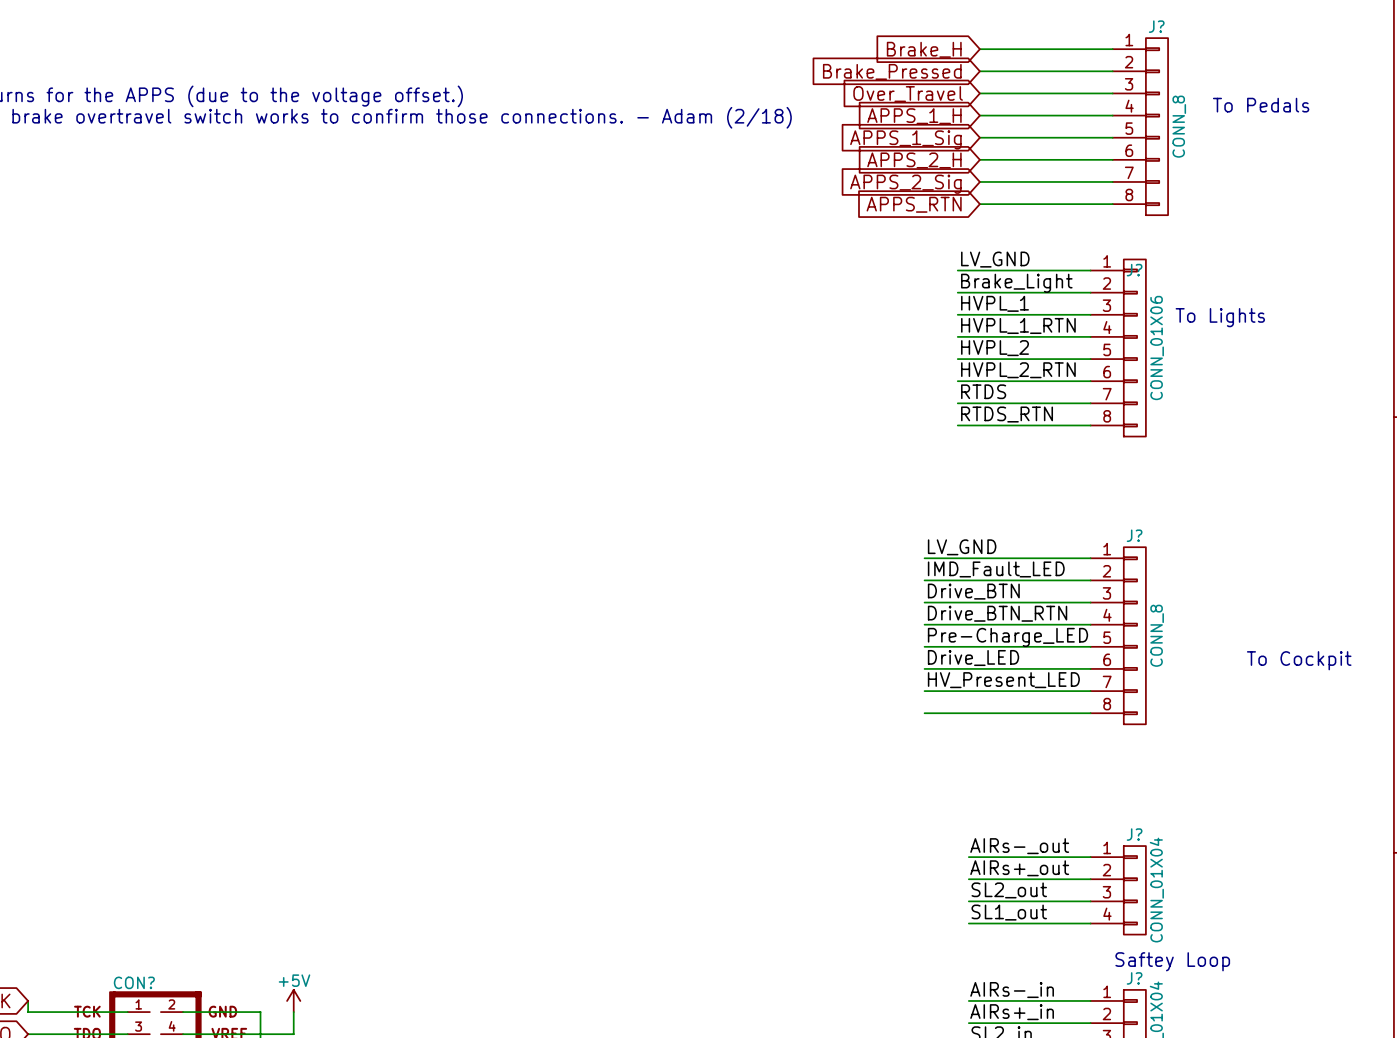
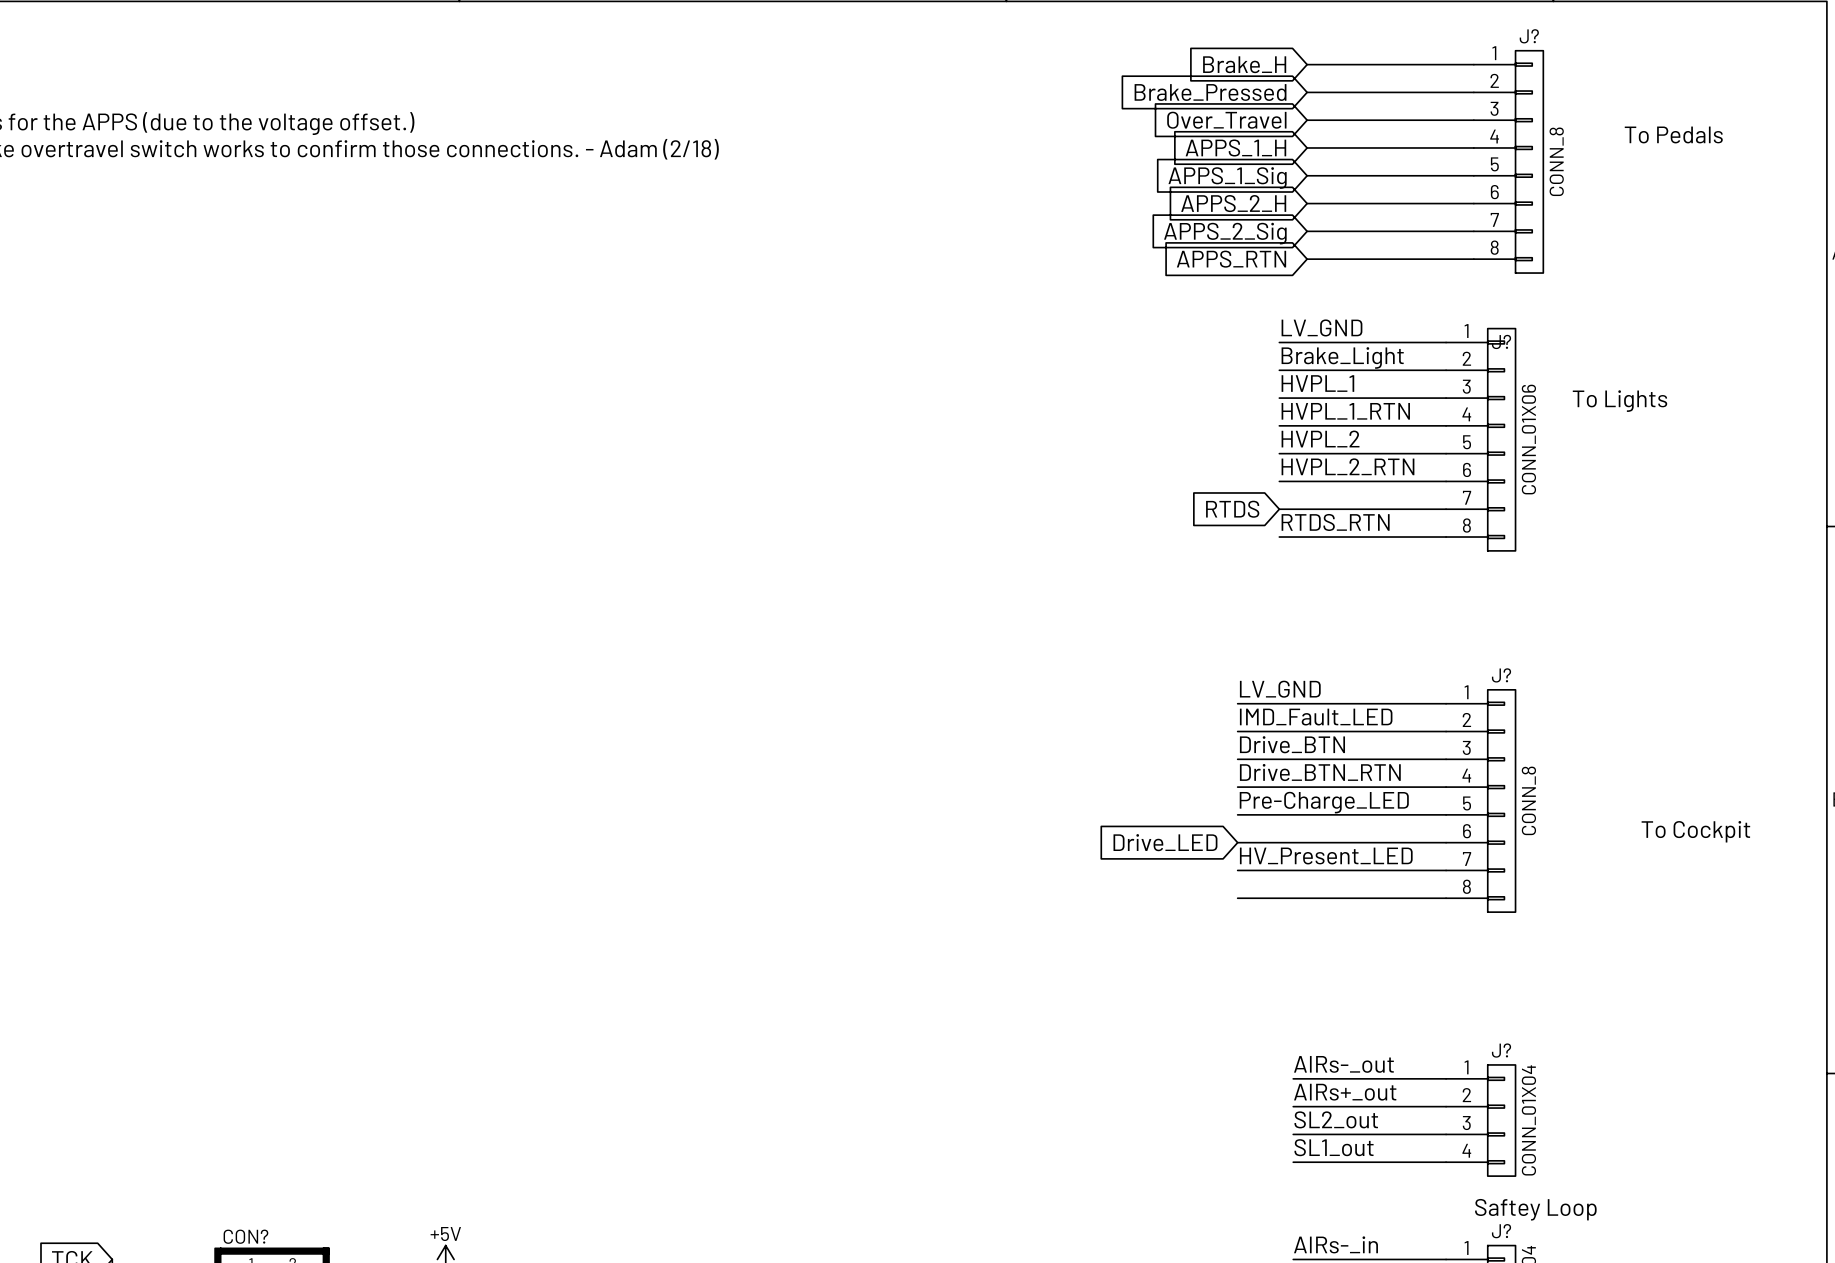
label: RTDS (983, 391) -> none
global label: none -> RTDS (1232, 509)
label: Drive_LED (973, 658) -> none
global label: none -> Drive_LED (1165, 842)

